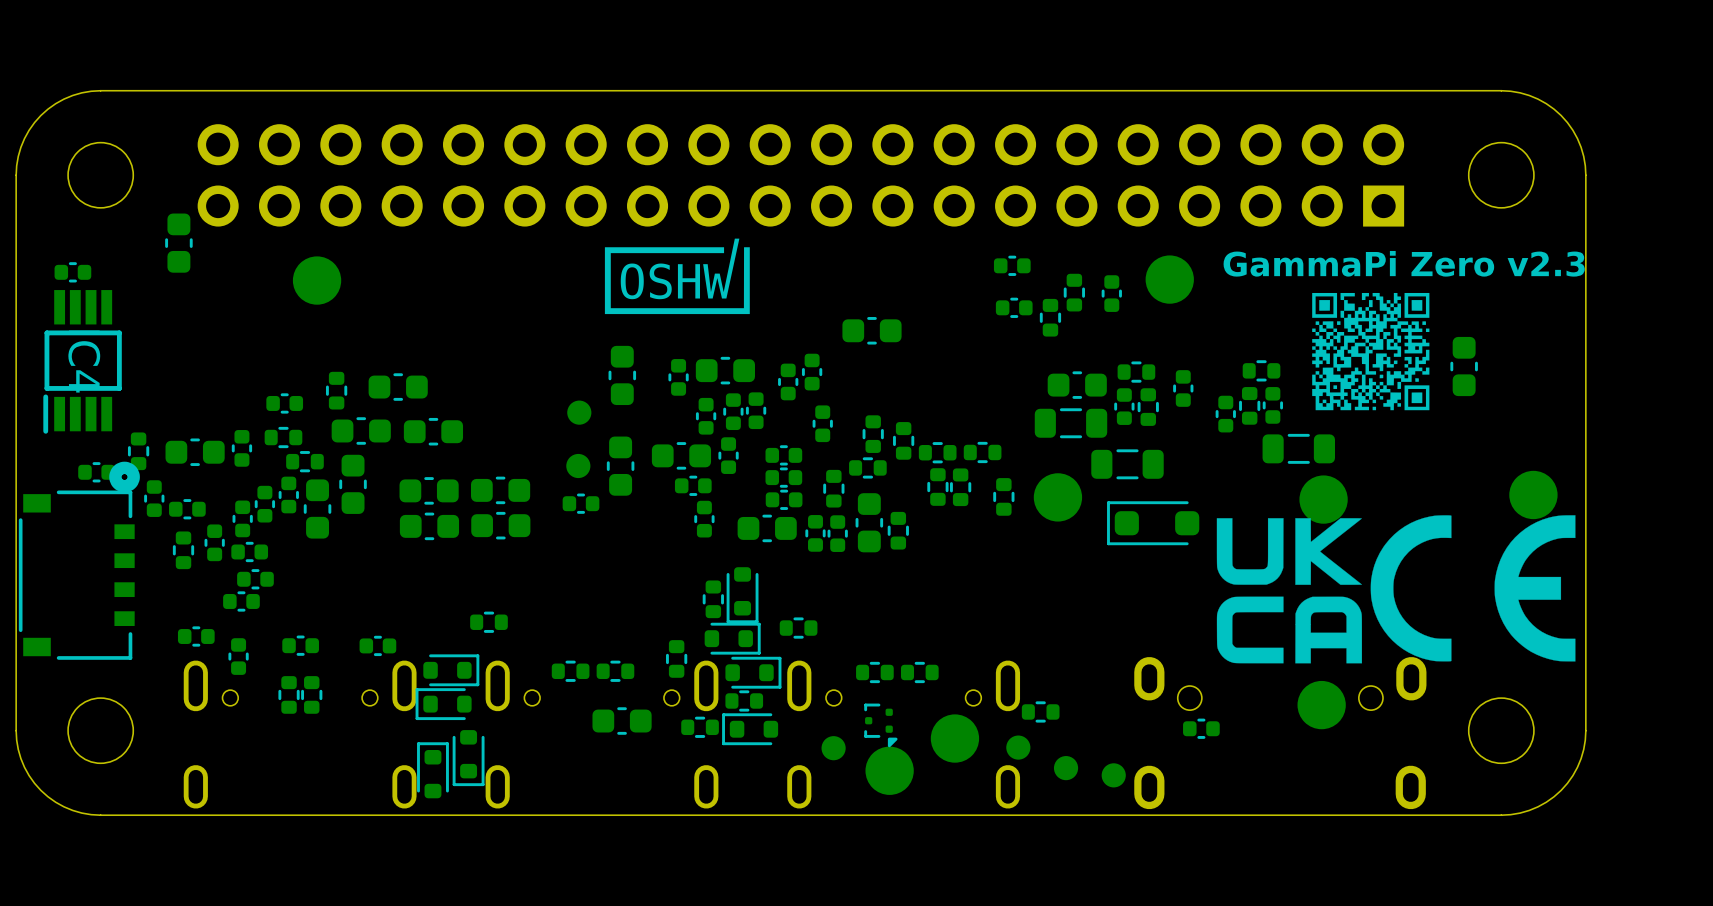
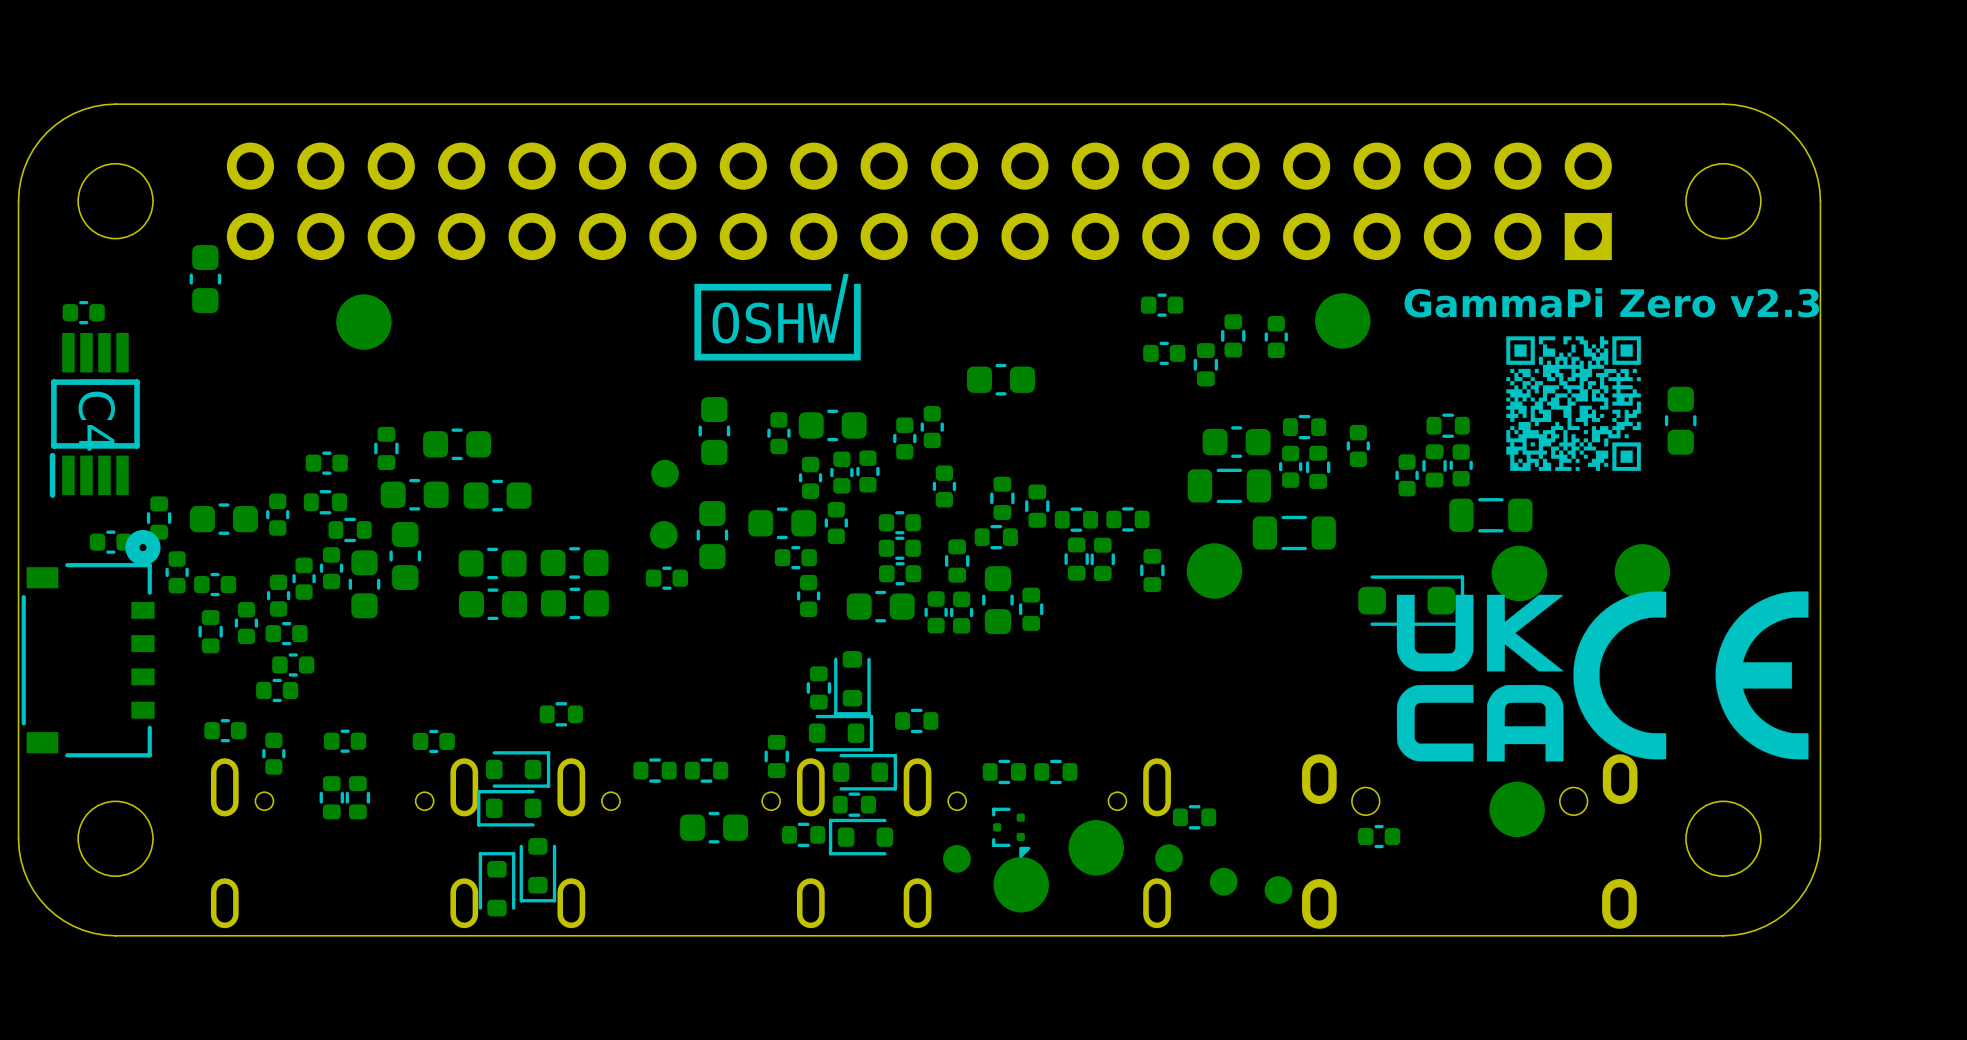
part position: (1533, 494) -> (1642, 571)
part rotation: 0° (1153, 523) -> 180° (1411, 600)
part position: (1153, 523) -> (1411, 600)

